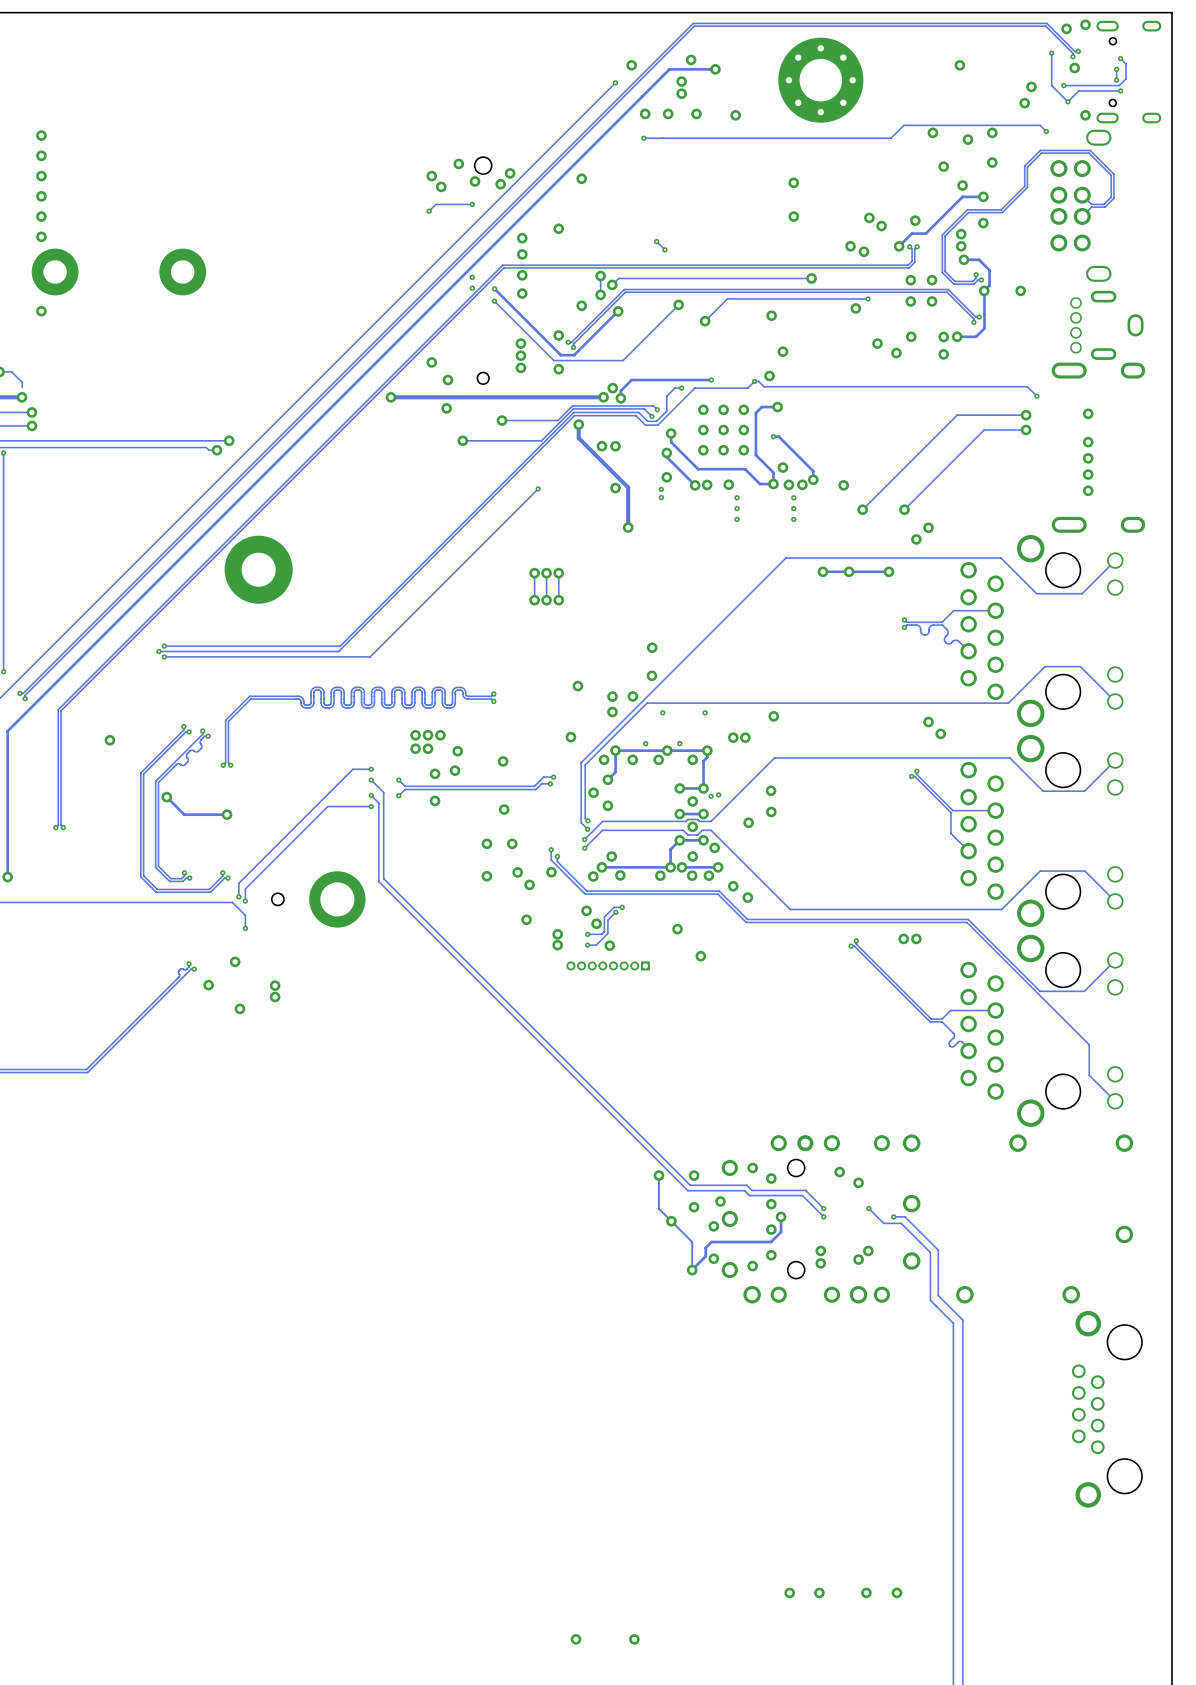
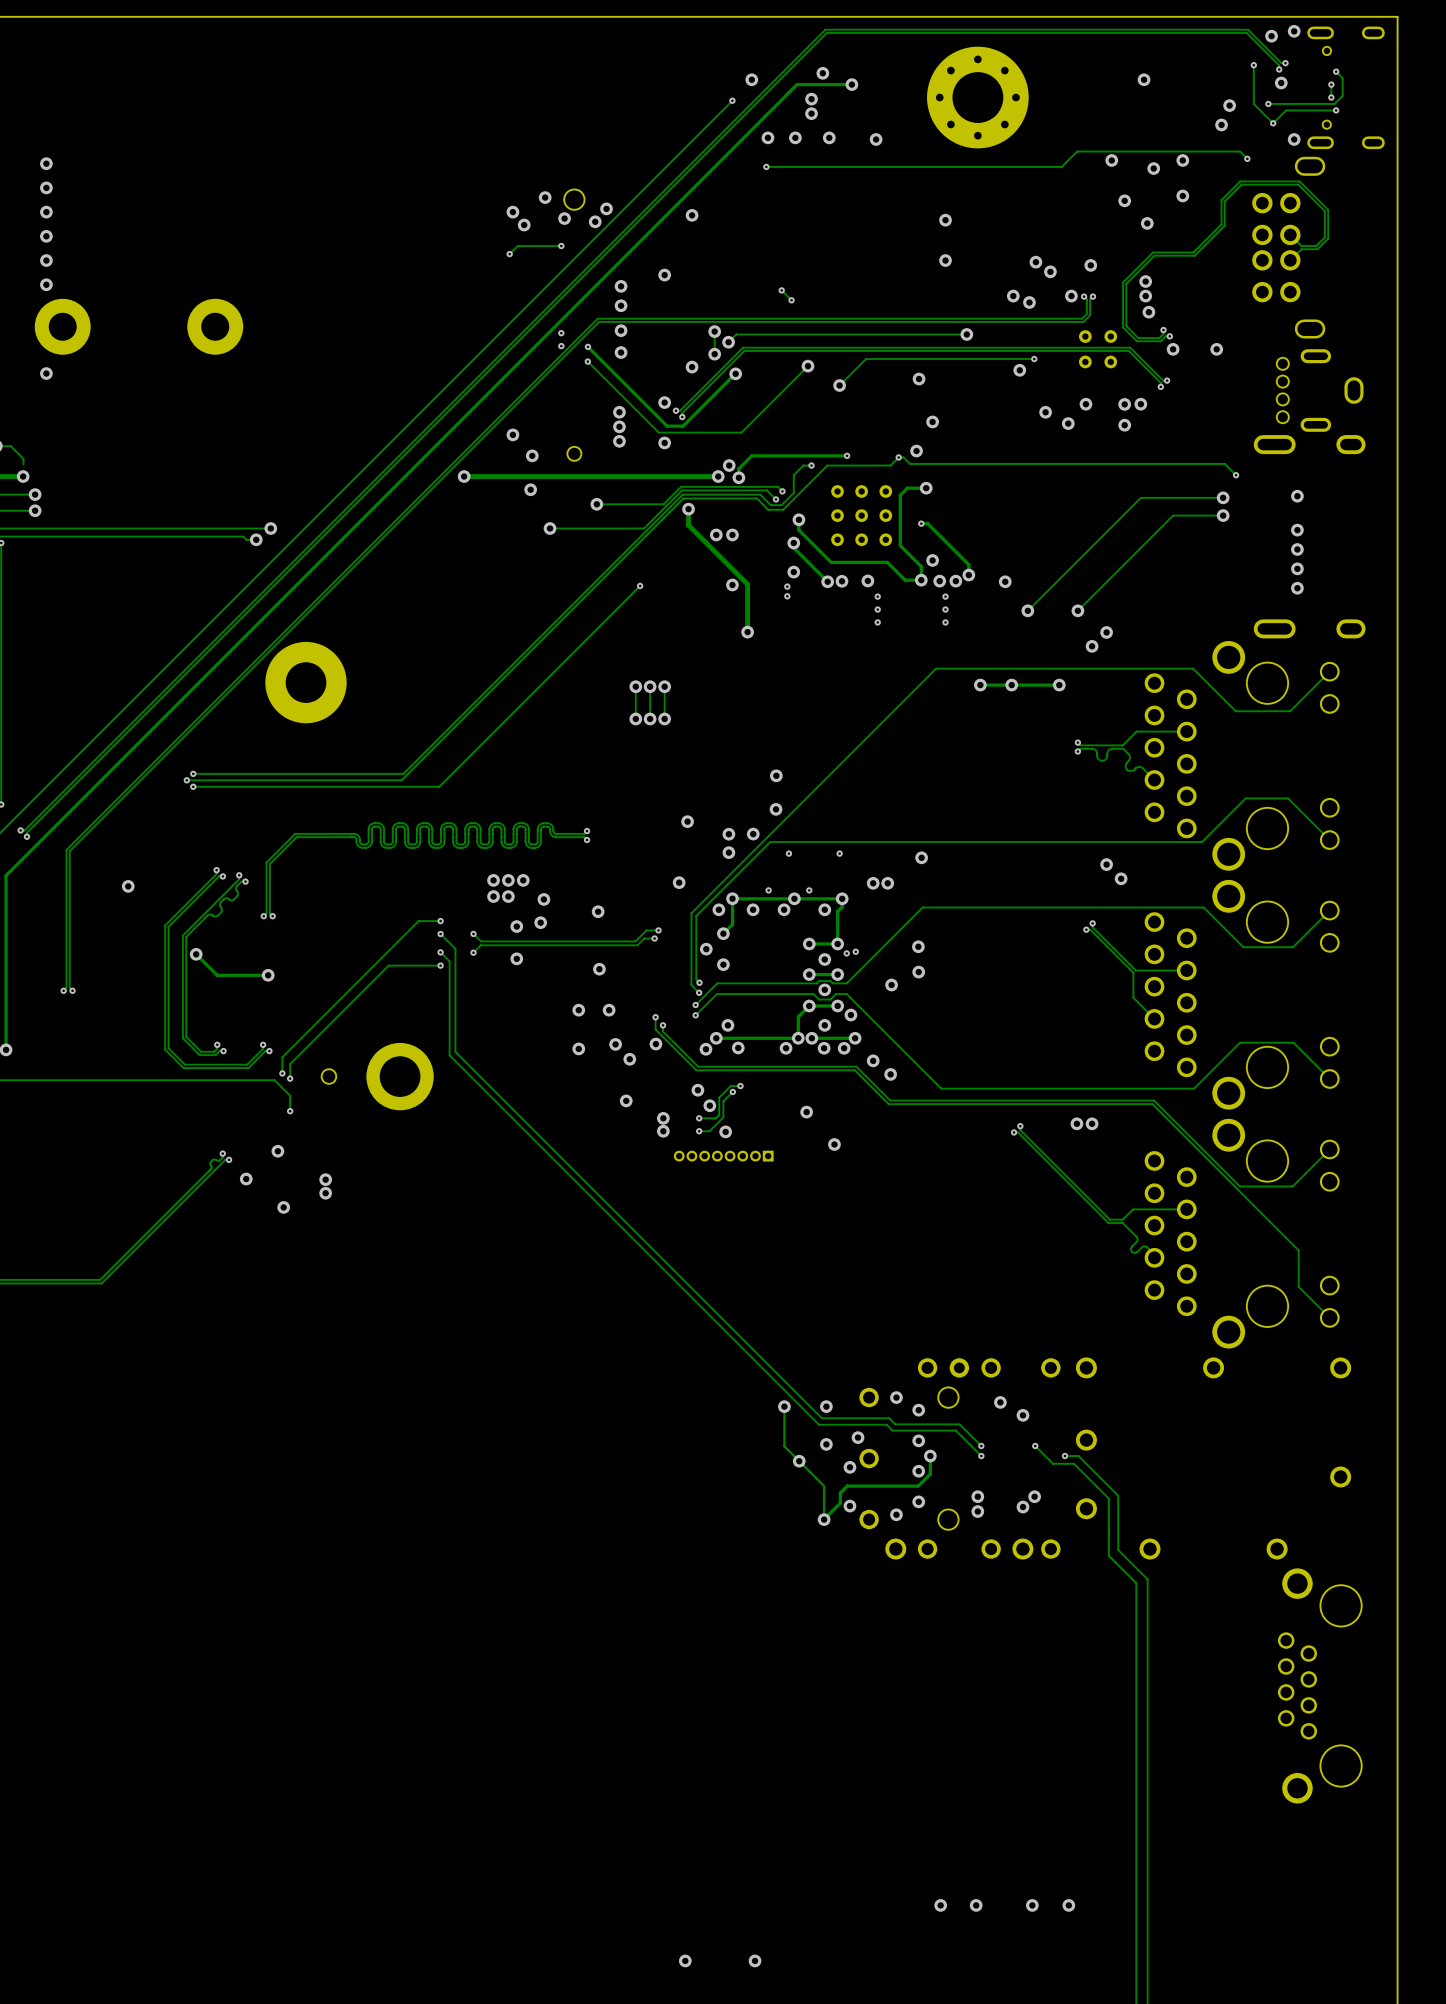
track: (983, 196) (962, 196) (925, 233) (911, 233) (899, 246) -> none
via: (983, 196) -> none
via: (983, 223) -> none
track: (963, 259) (979, 259) (989, 270) (989, 285) (984, 290) (984, 328) (976, 336) (957, 336) -> none

